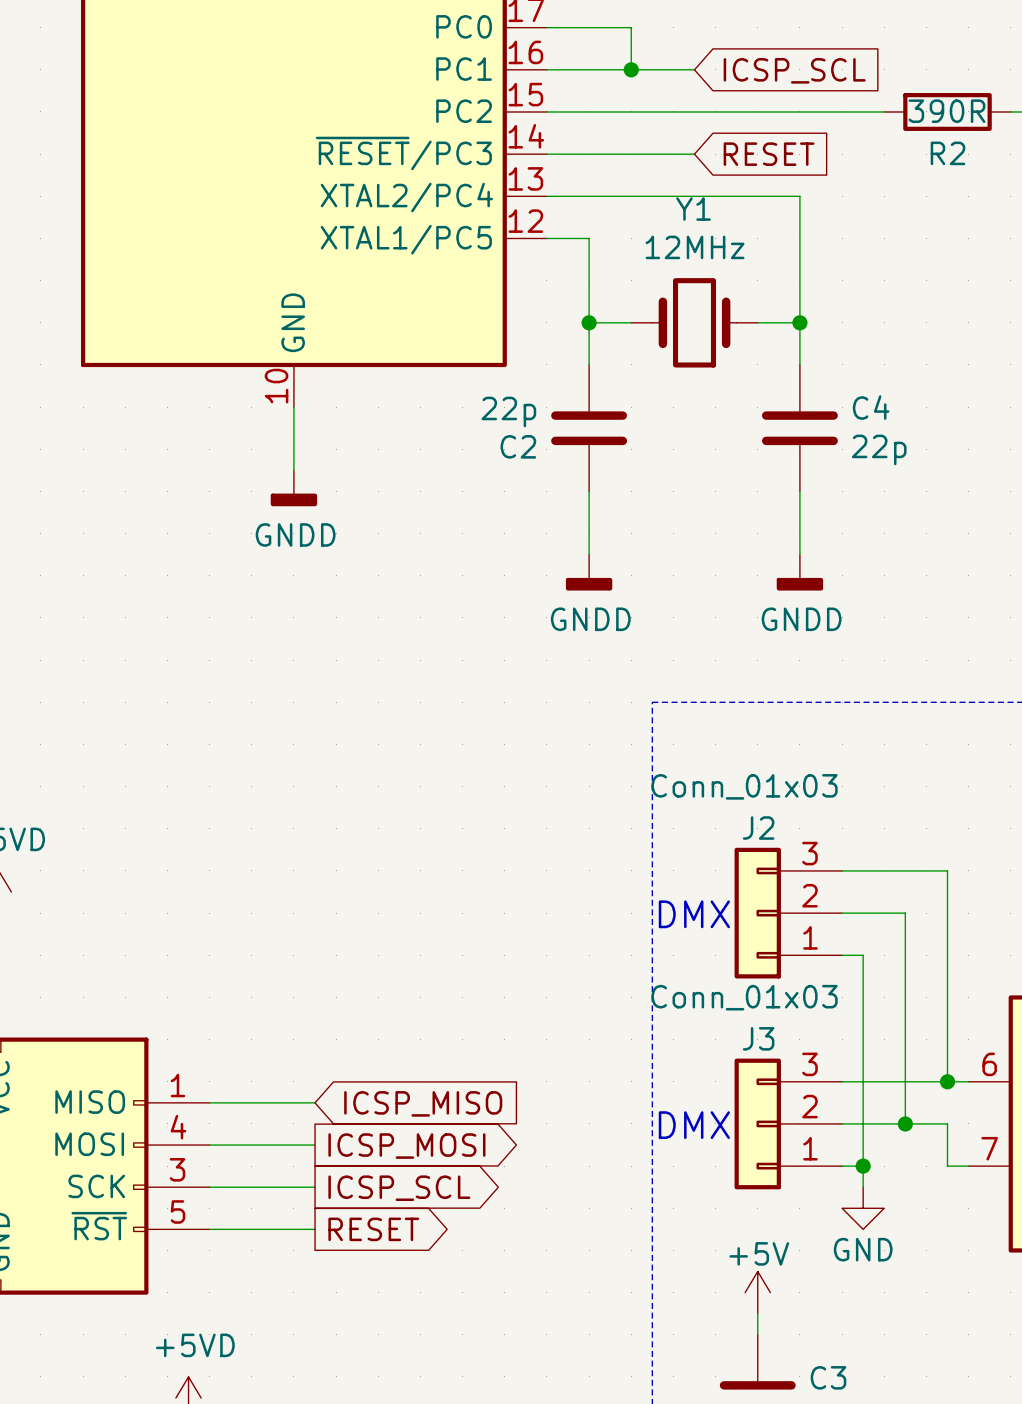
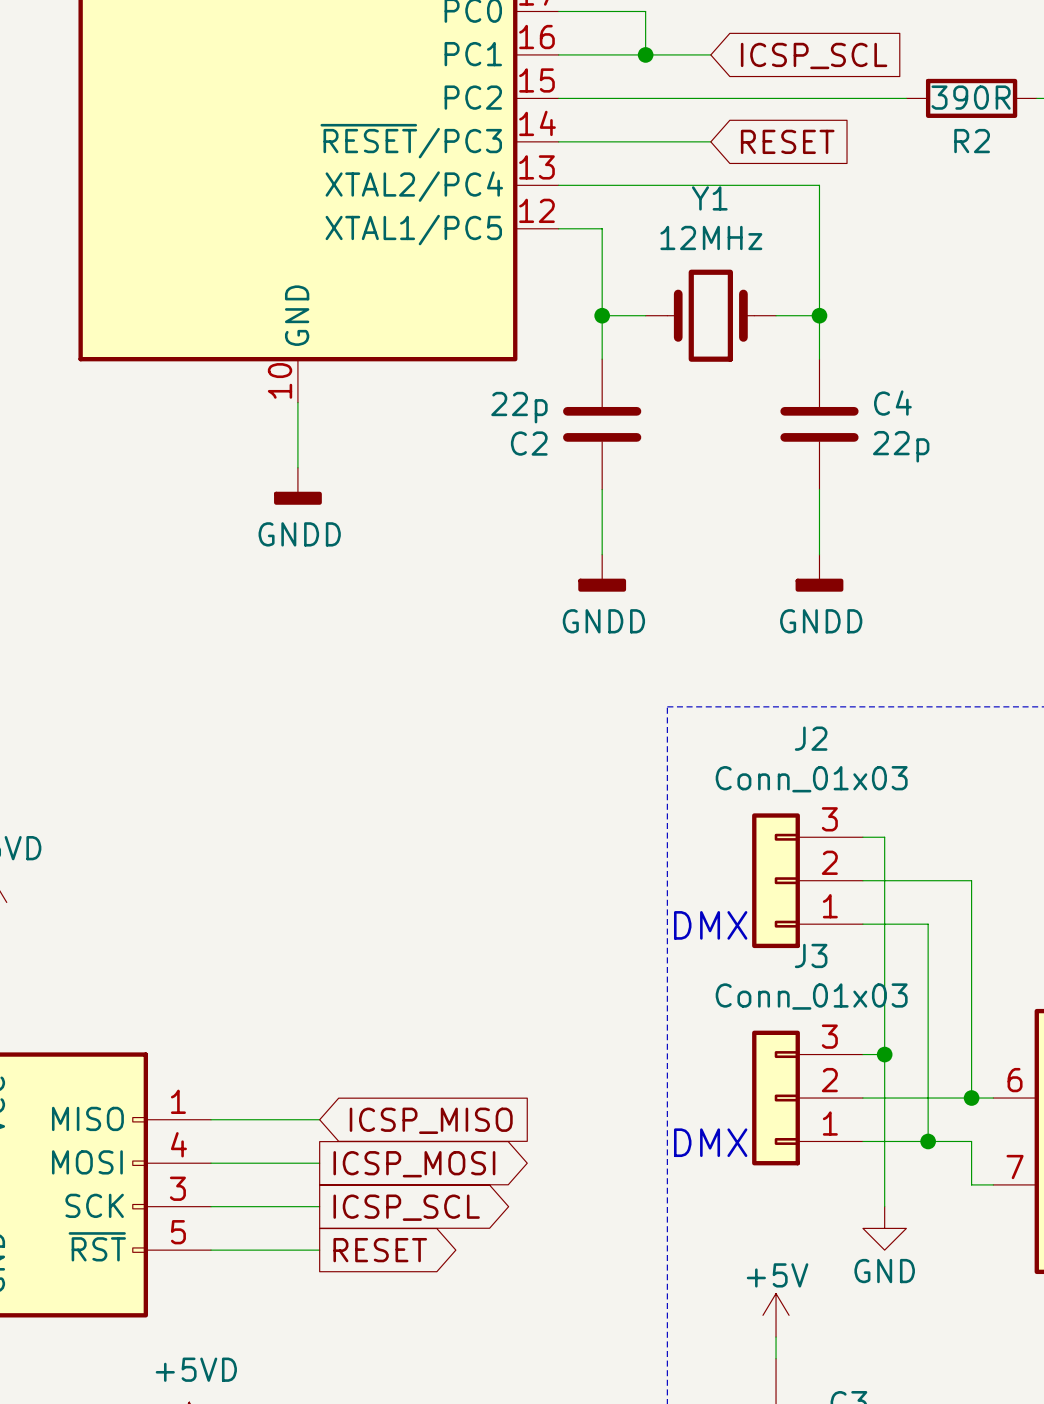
J2 value position: Conn_01x03 (744, 786) -> Conn_01x03 (811, 779)
J2 name position: J2 (758, 828) -> J2 (811, 738)
J2 position: (788, 913) -> (807, 880)
wire: (842, 955) (863, 955) -> (862, 837) (884, 837) (884, 967)
J3 value position: Conn_01x03 (744, 997) -> Conn_01x03 (811, 996)
J3 name position: J3 (758, 1038) -> J3 (811, 955)
junction: none -> (884, 1054)
J3 position: (788, 1123) -> (807, 1098)
wire: (842, 1166) (863, 1166) -> (862, 1054) (884, 1054)
junction: (863, 1166) -> none

